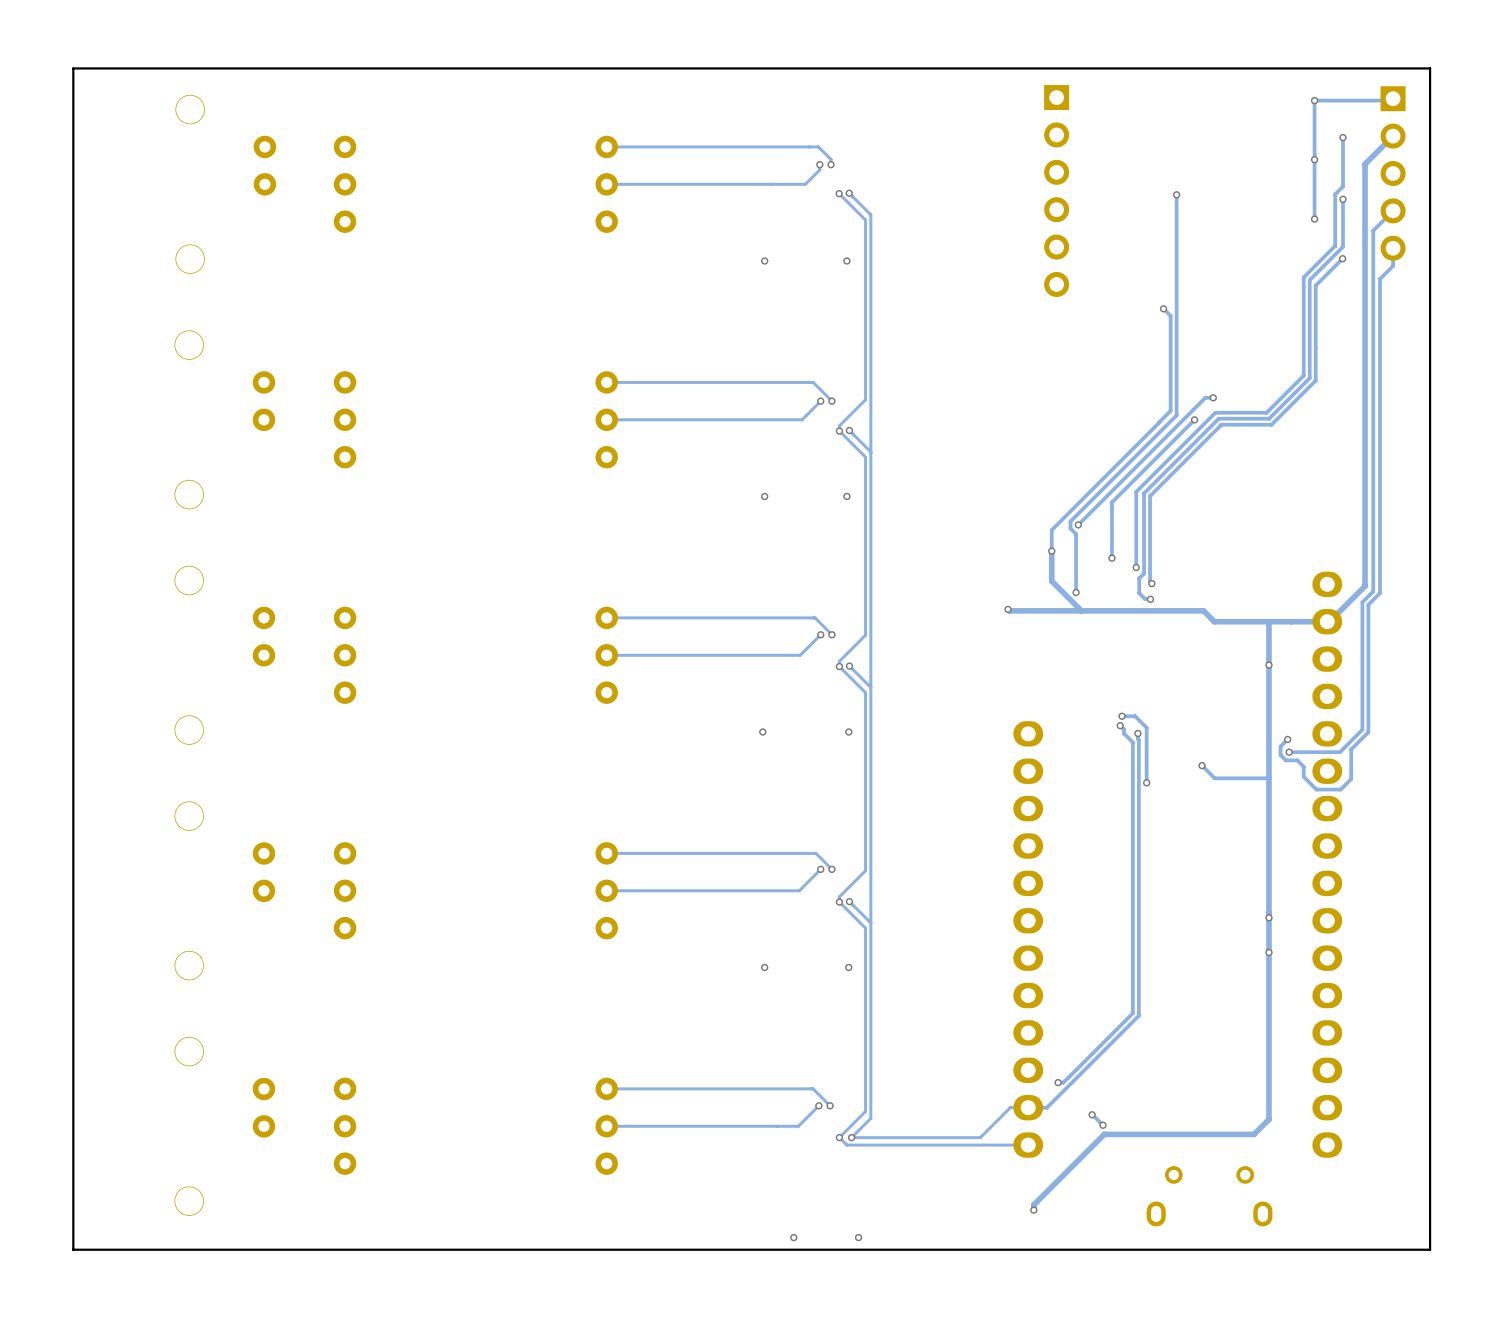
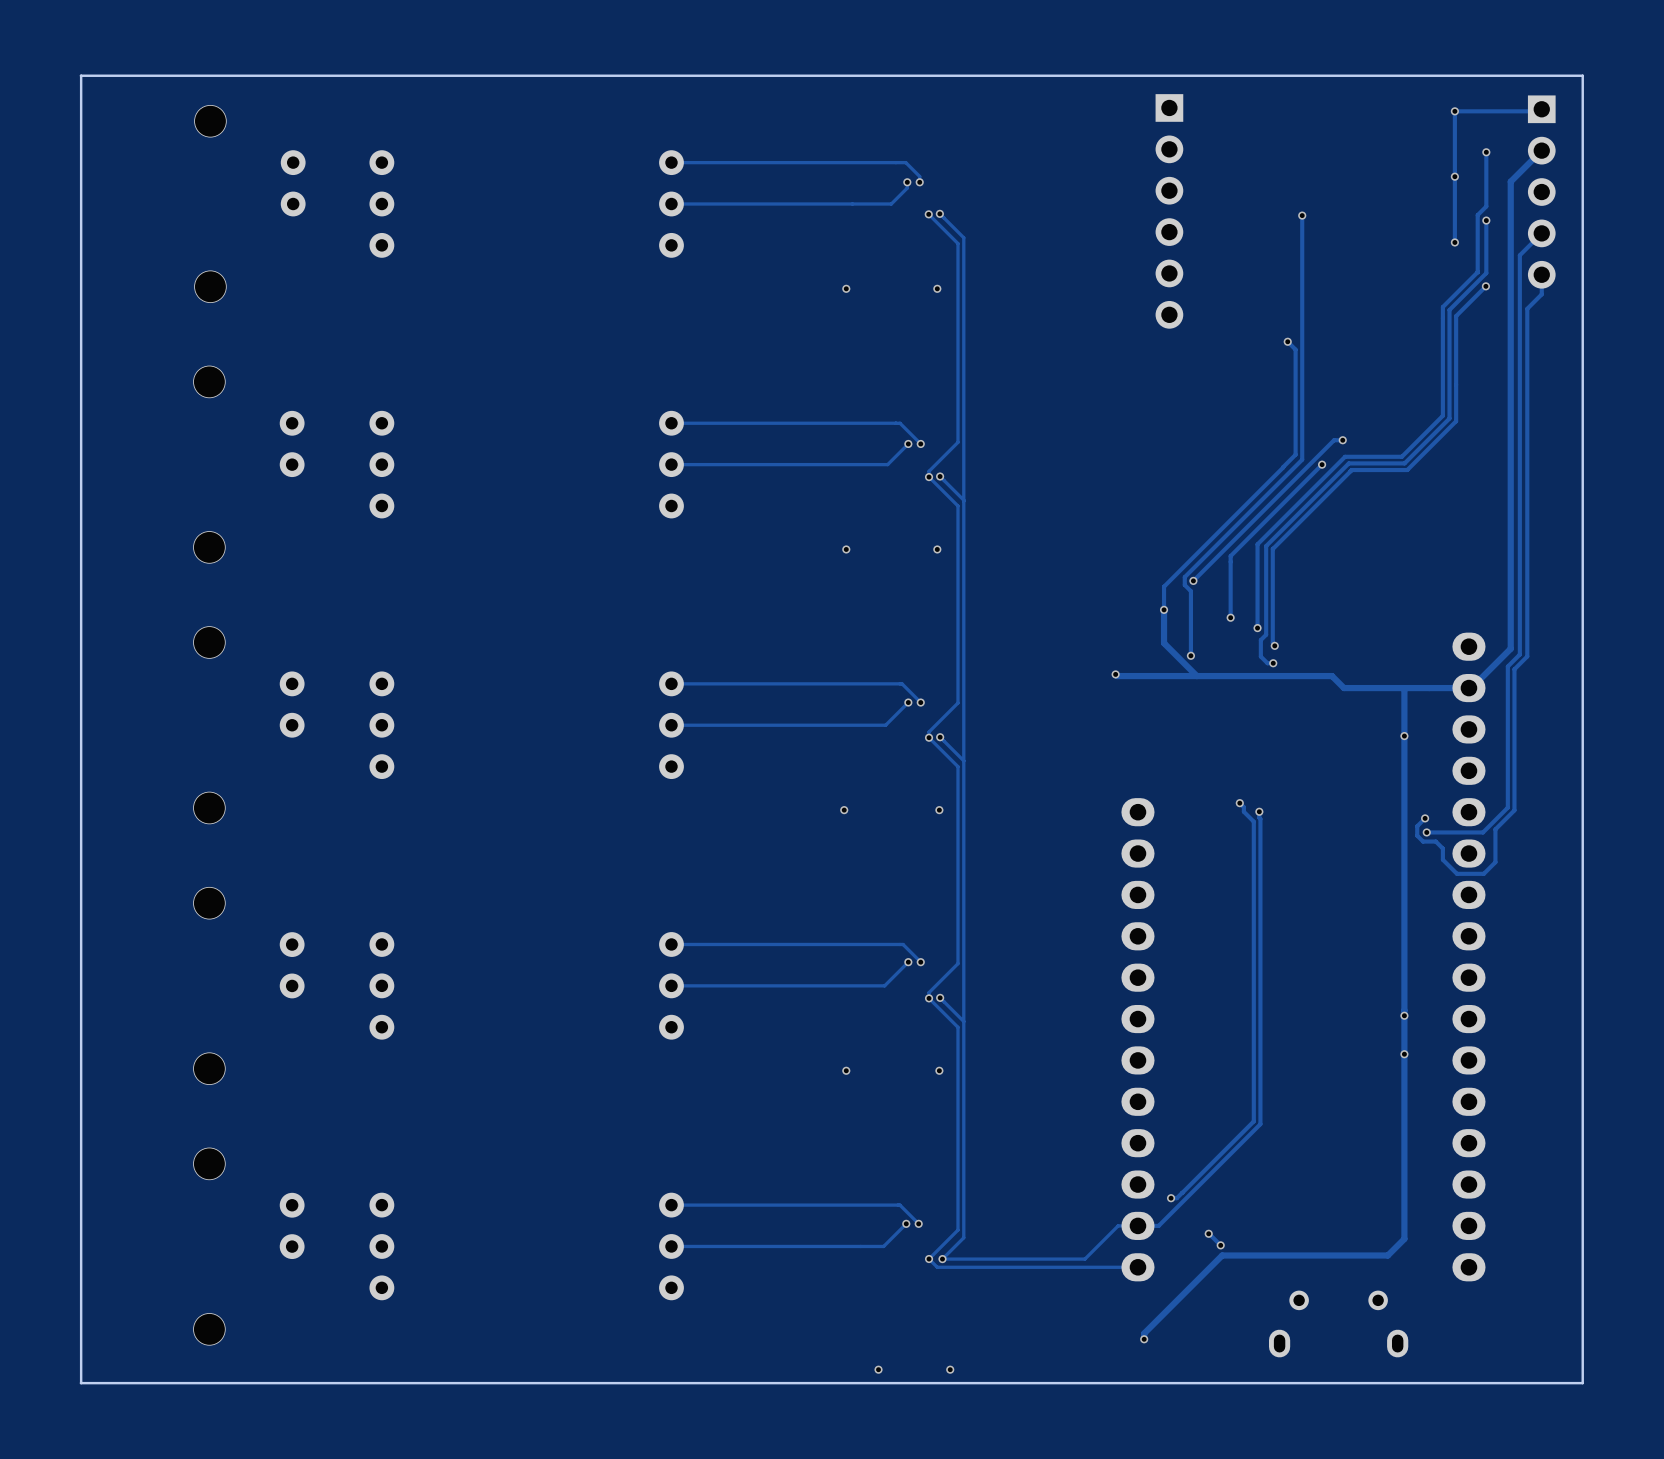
track: (1122, 716) (1135, 716) (1146, 727) (1146, 782) -> none
via: (1122, 716) -> none
track: (1202, 765) (1214, 778) (1268, 778) -> none
via: (1202, 765) -> none
via: (1146, 782) -> none

